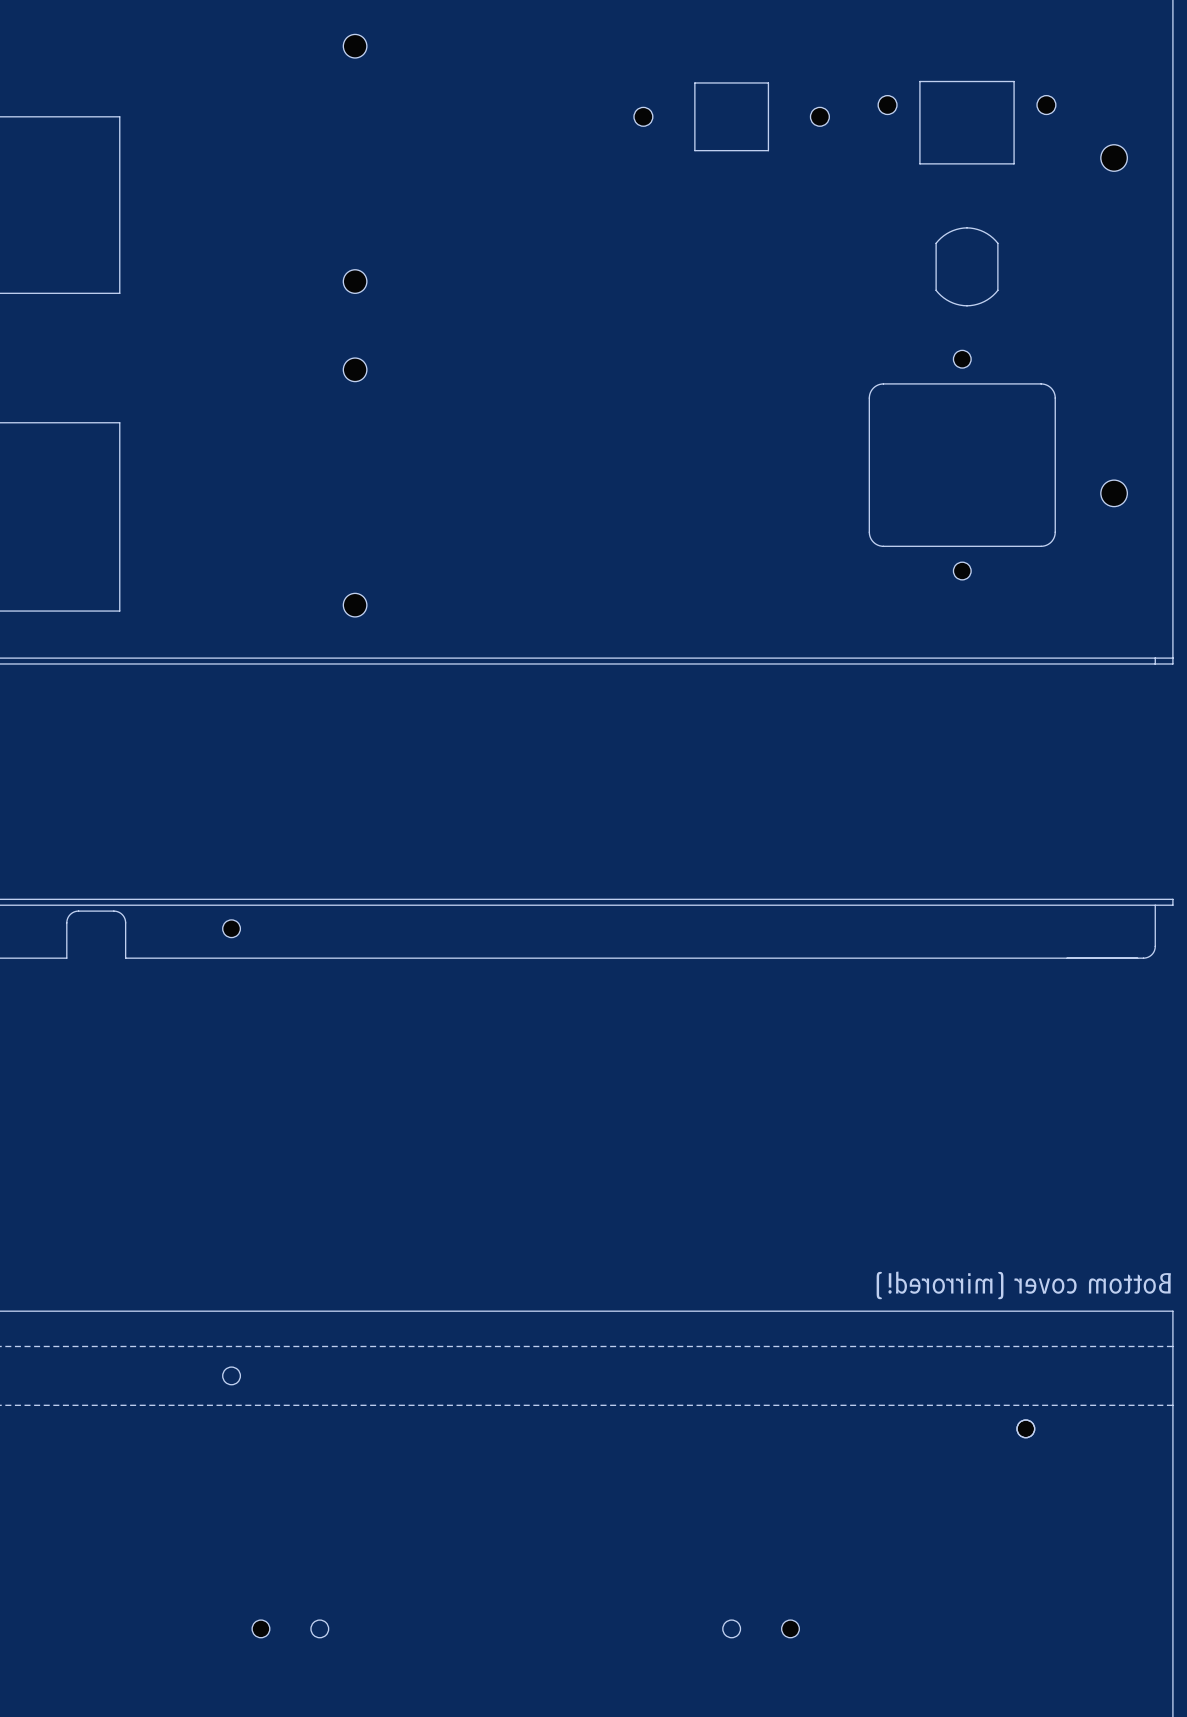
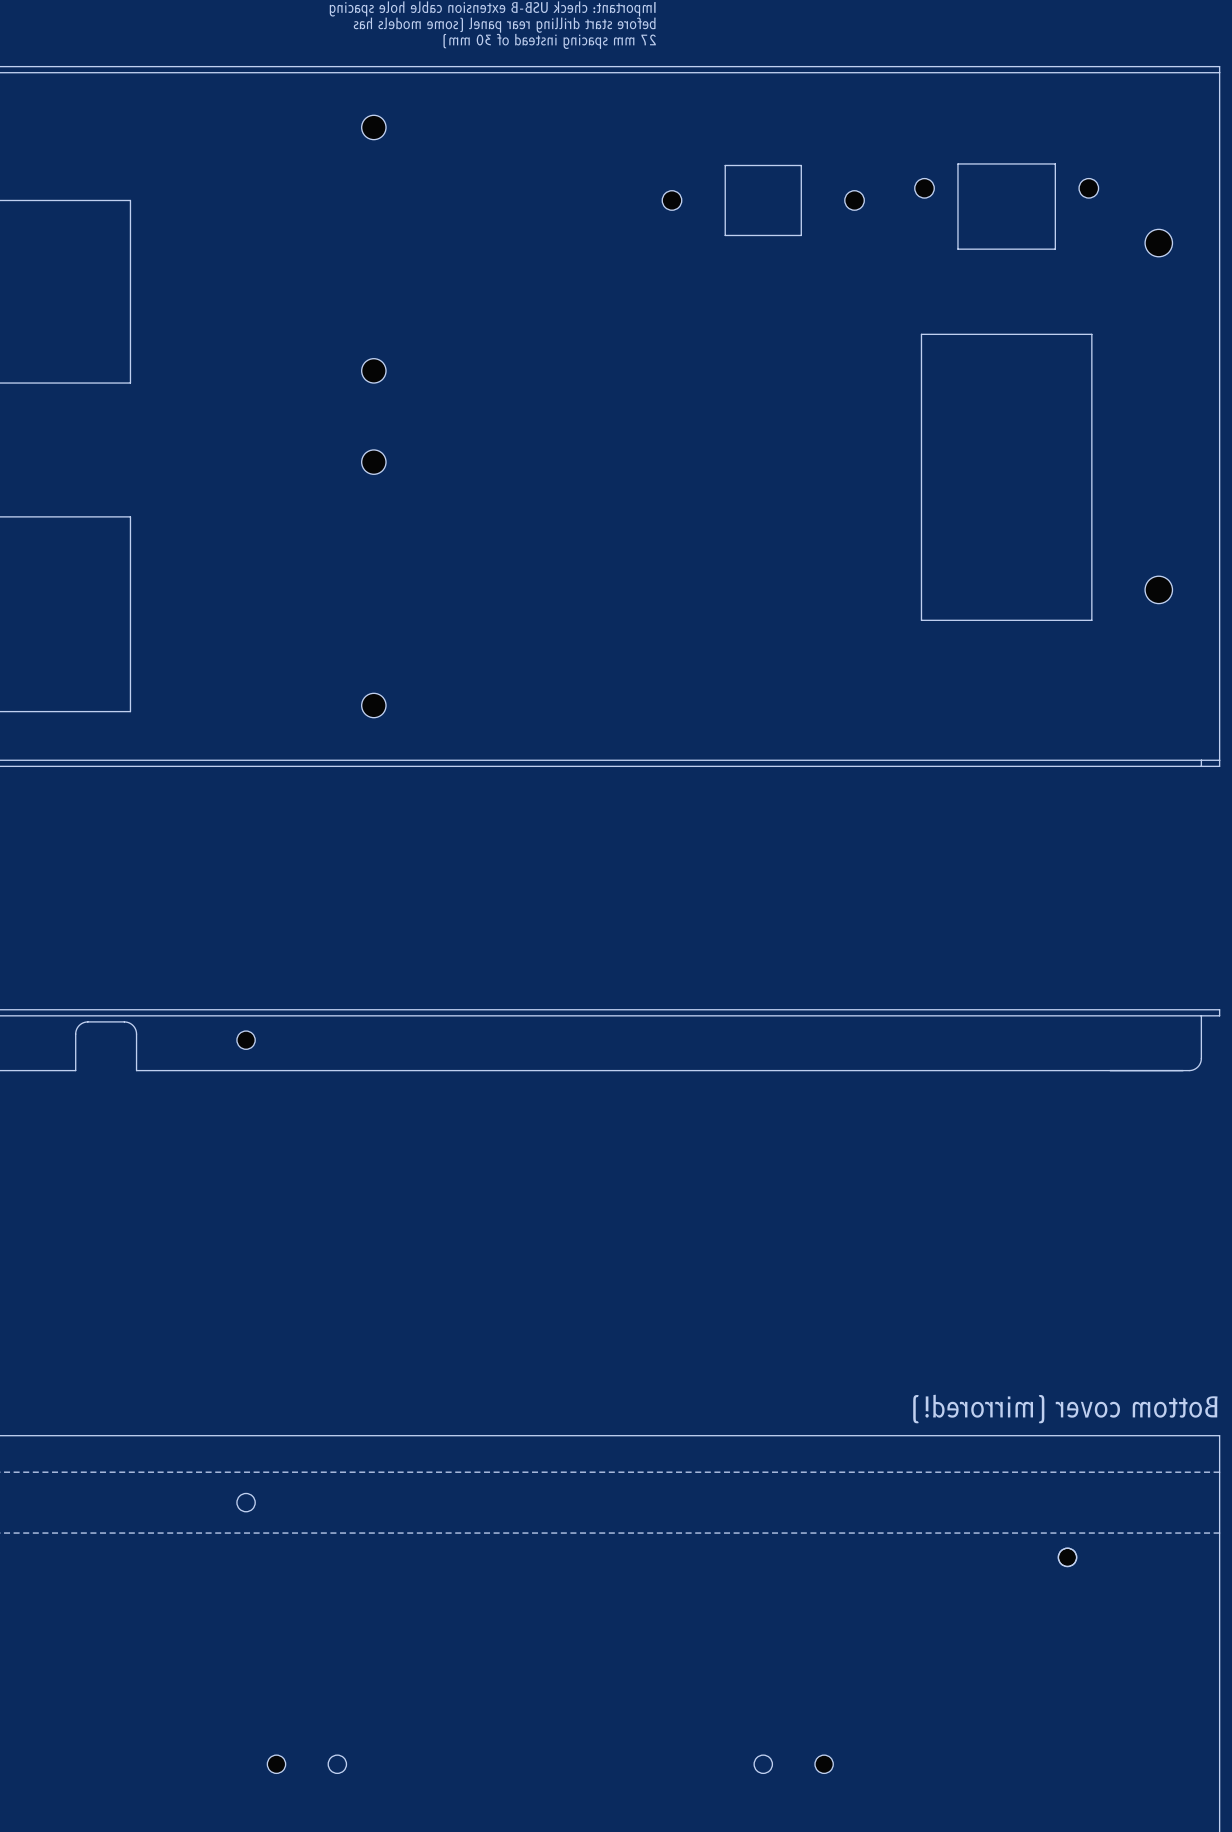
board edge: (967, 227) (949, 232) (936, 243) (936, 290) (949, 301) (967, 305) (984, 301) (997, 290) (997, 243) (984, 232) (967, 227) -> none
board edge: none -> (1091, 334) (921, 334) (921, 620) (1091, 620) (1091, 334)
hole: (962, 359) -> none
board edge: (1041, 383) (883, 383) (873, 388) (869, 398) (869, 532) (873, 542) (883, 546) (1041, 546) (1051, 542) (1055, 532) (1055, 398) (1051, 388) (1041, 383) -> none
hole: (962, 571) -> none

